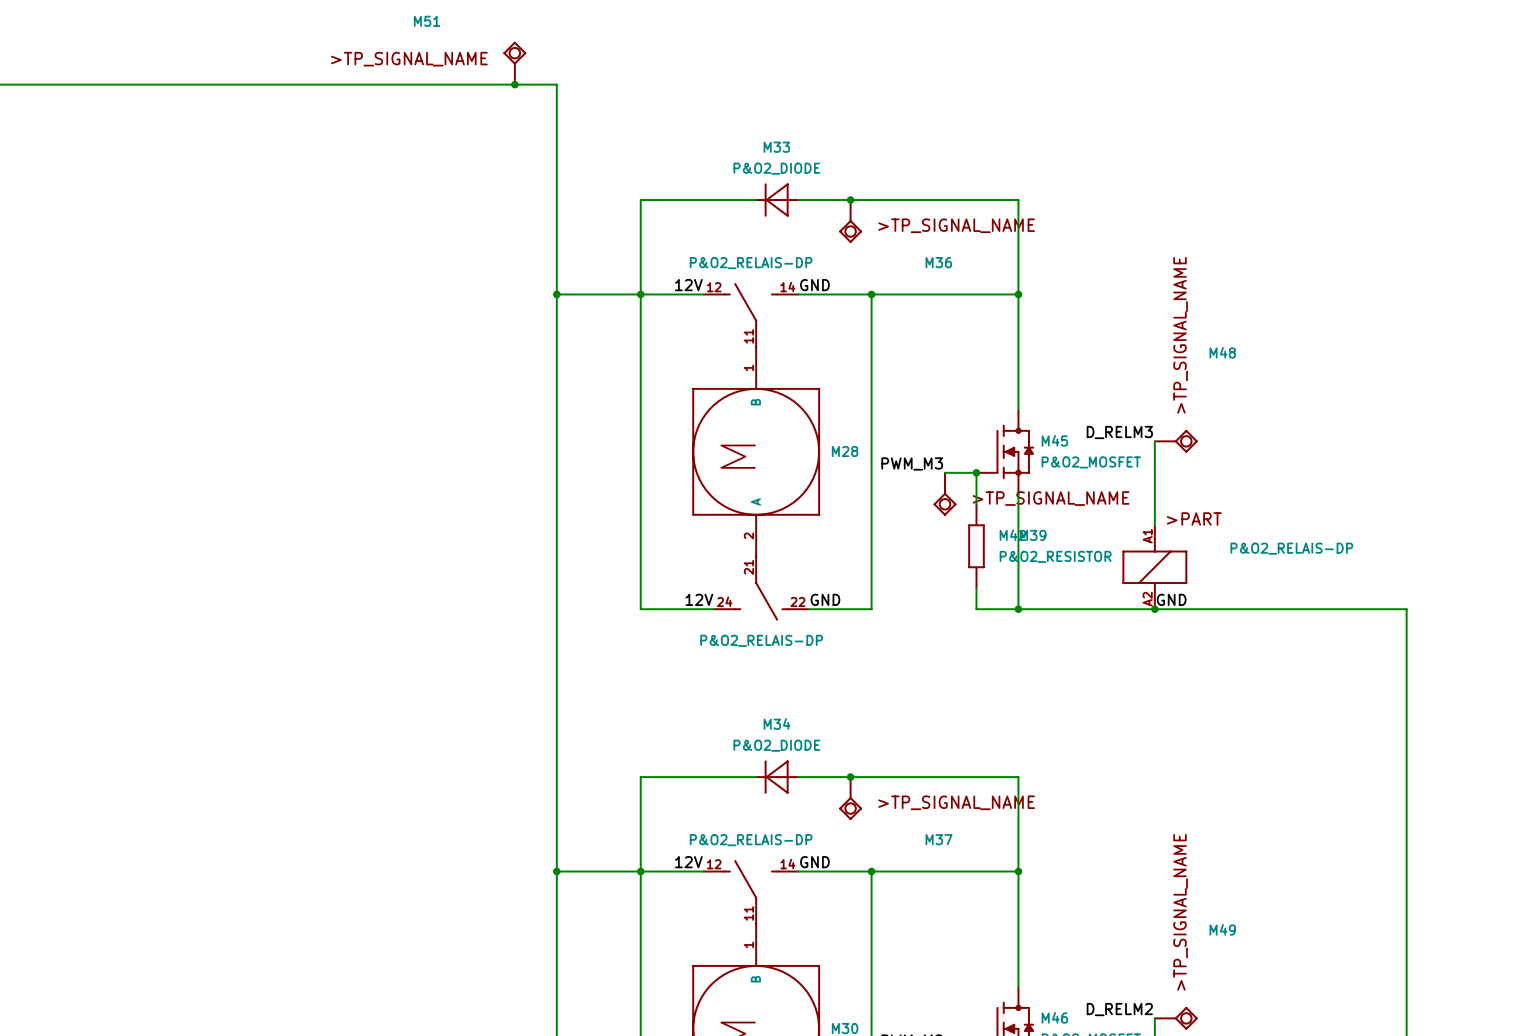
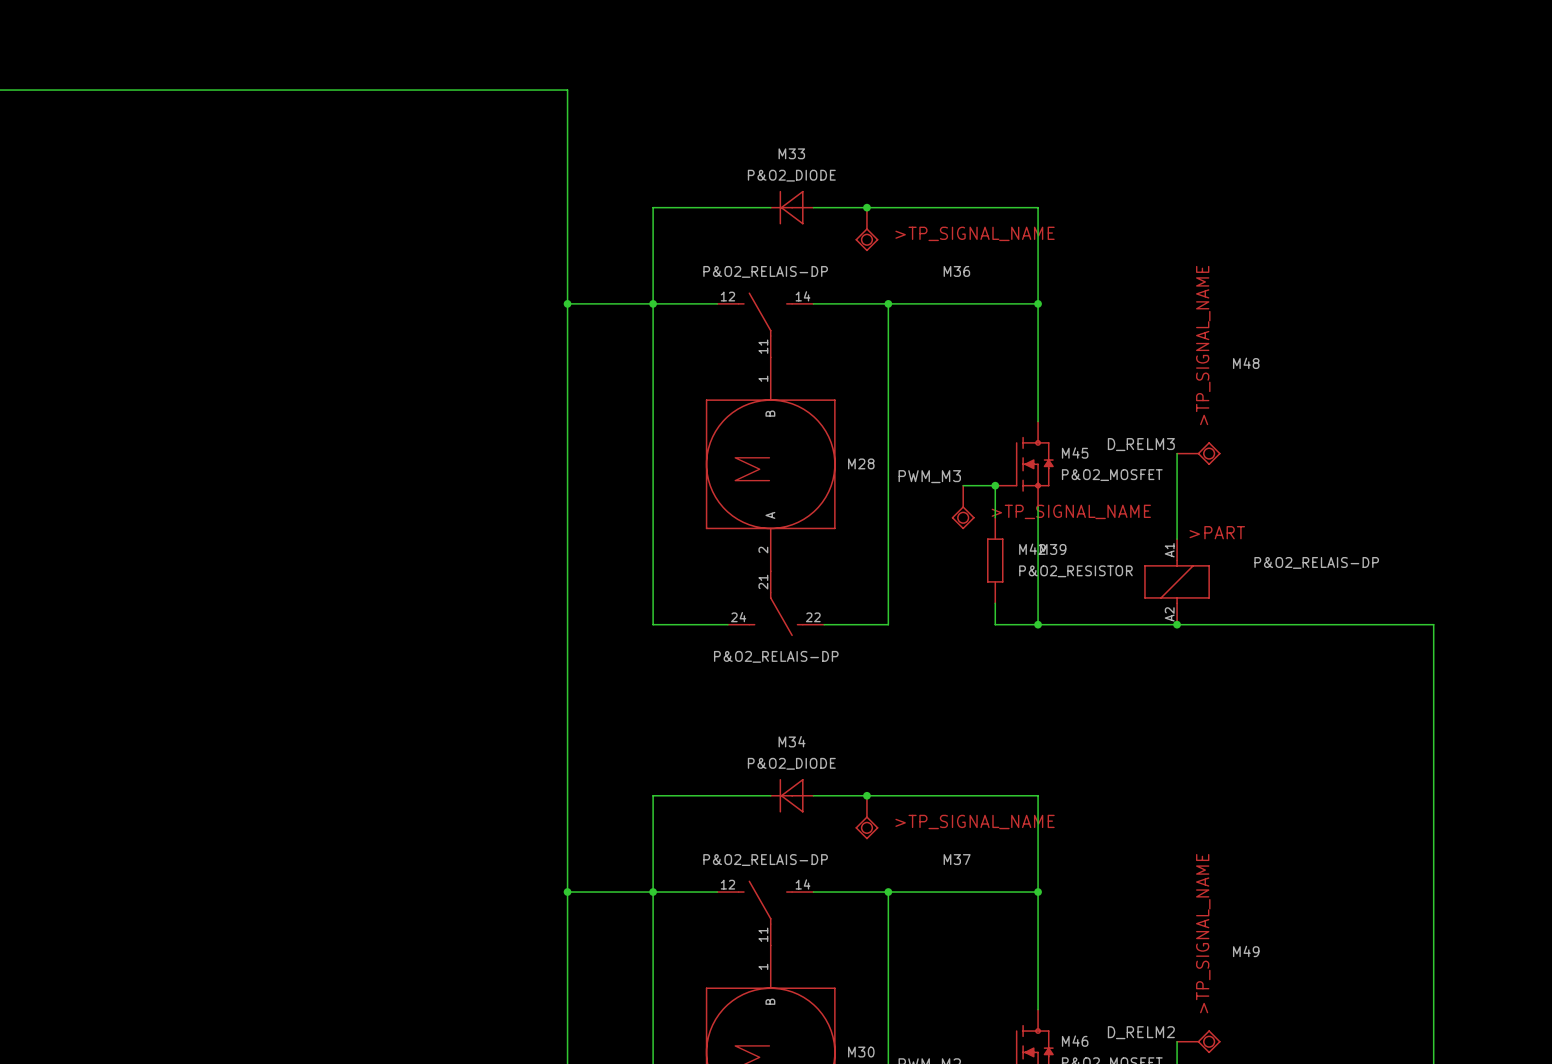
M51: (514, 63) -> none
junction: (514, 84) -> none
label: 12V (688, 285) -> none
label: GND (814, 285) -> none
label: 12V (699, 599) -> none
label: GND (825, 599) -> none
label: GND (1171, 599) -> none
label: 12V (688, 862) -> none
label: GND (814, 862) -> none

